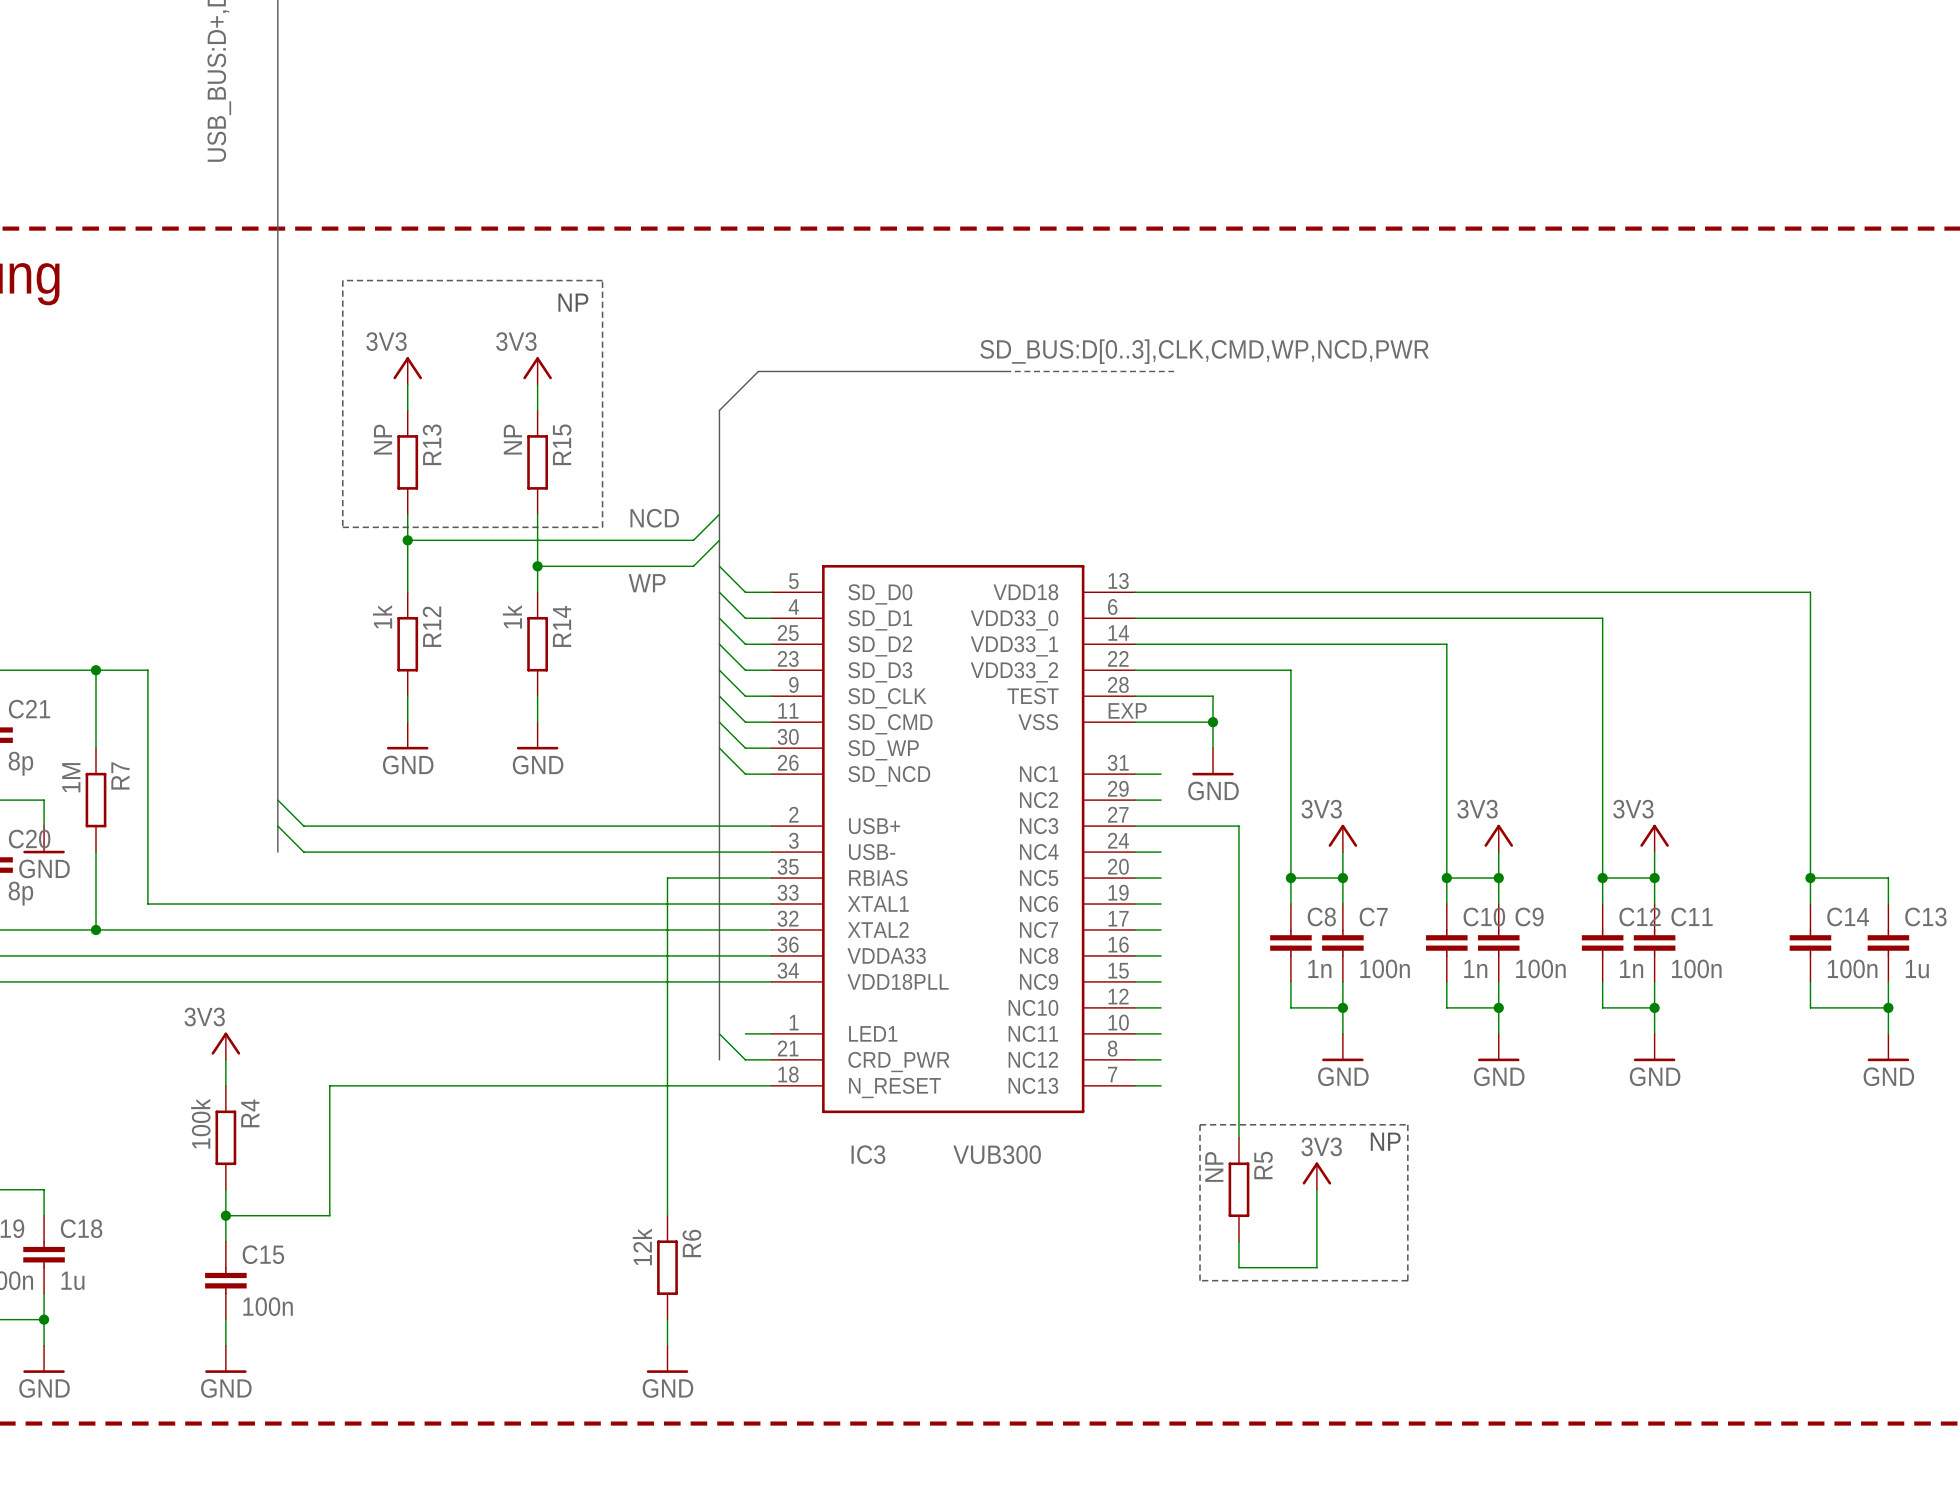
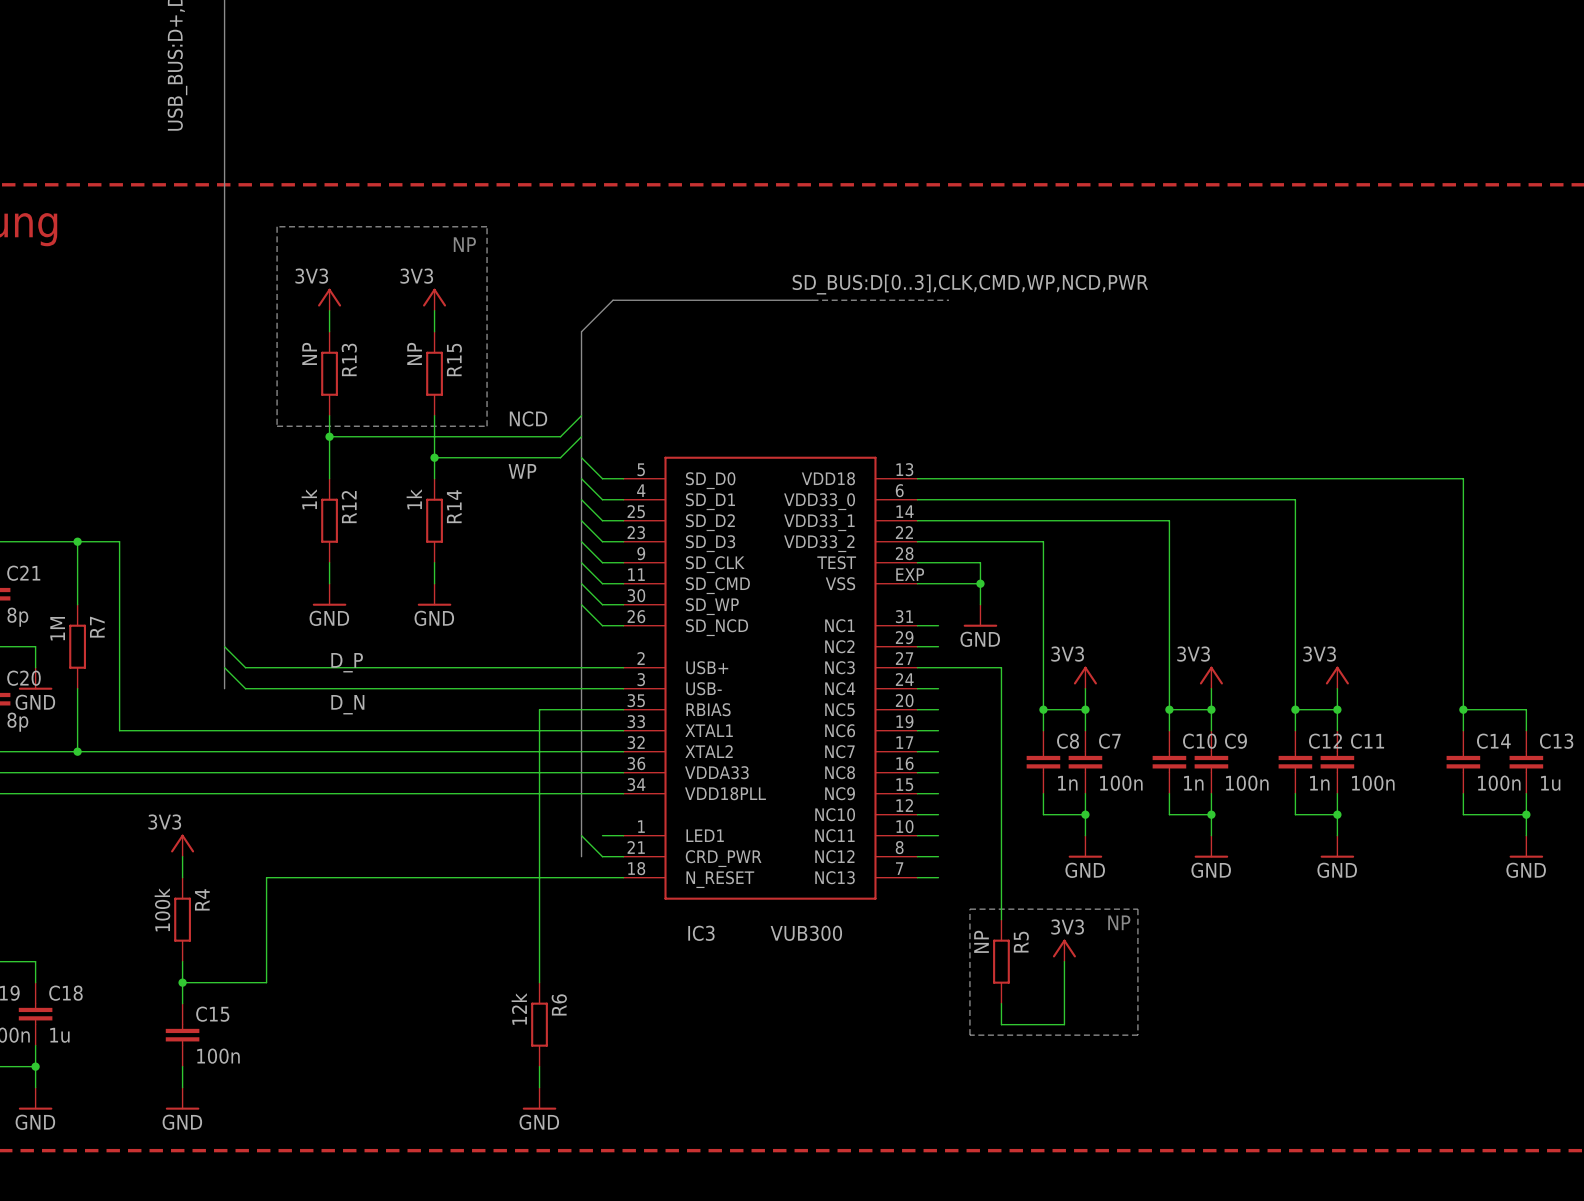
label: none -> D_P (347, 662)
label: none -> D_N (347, 704)

